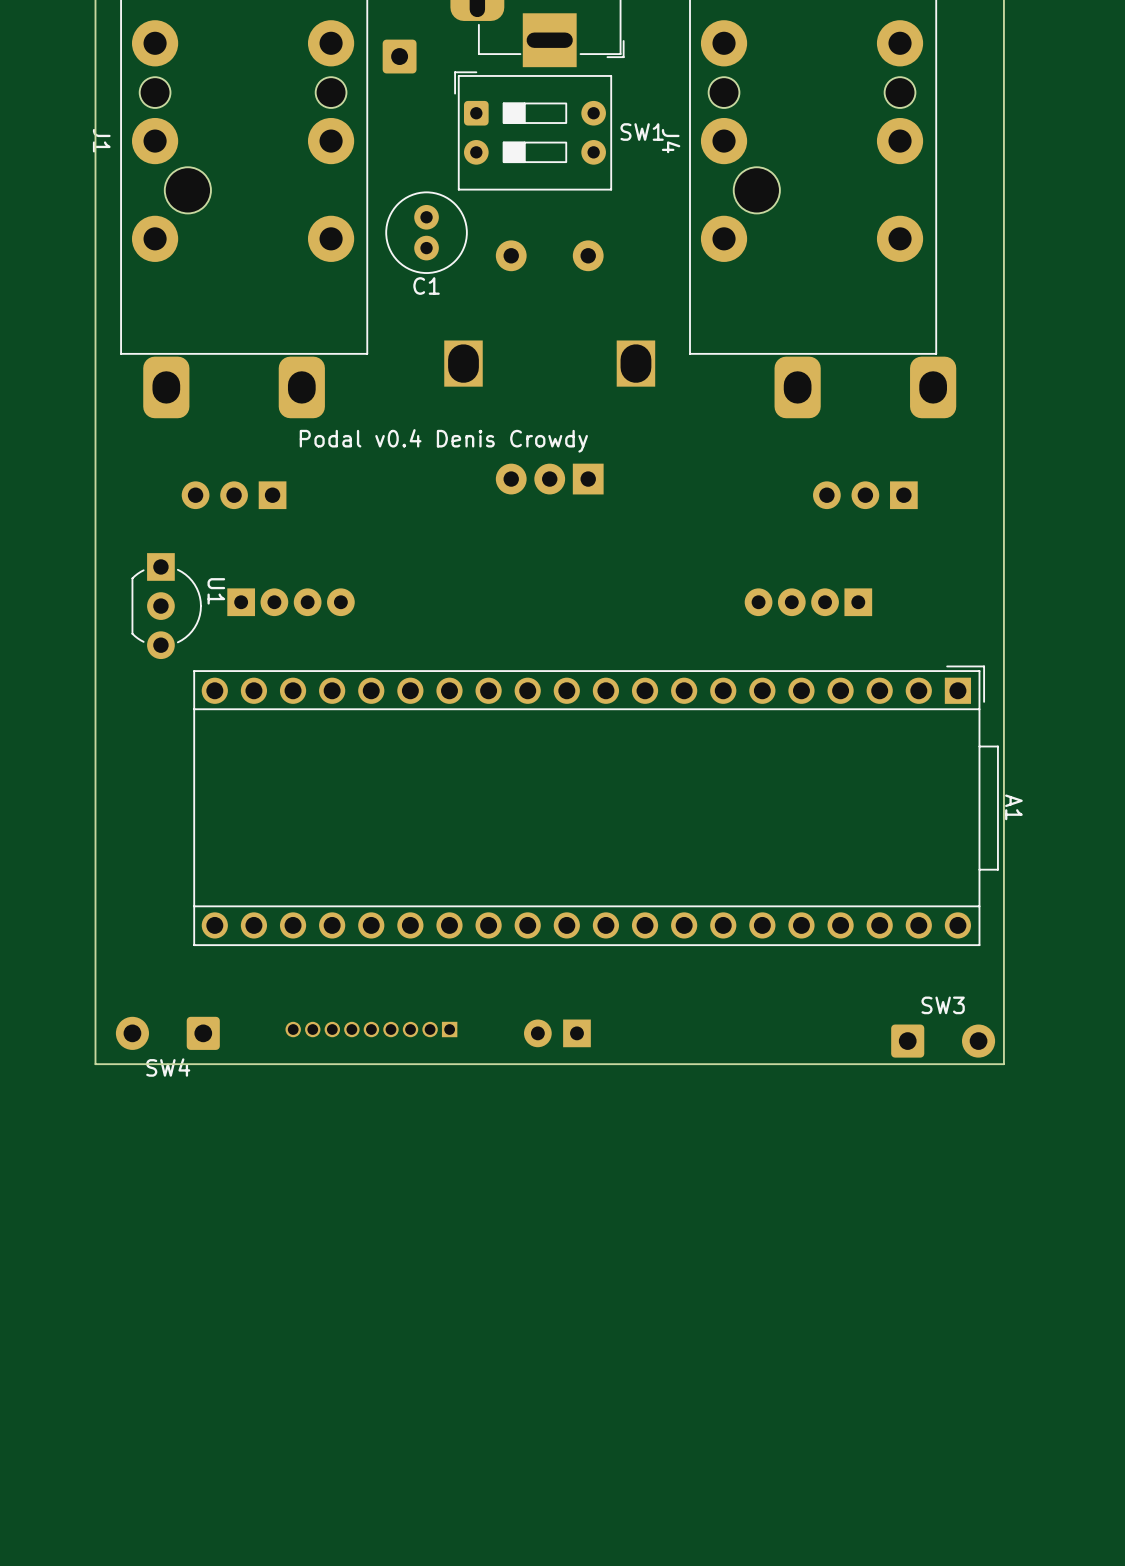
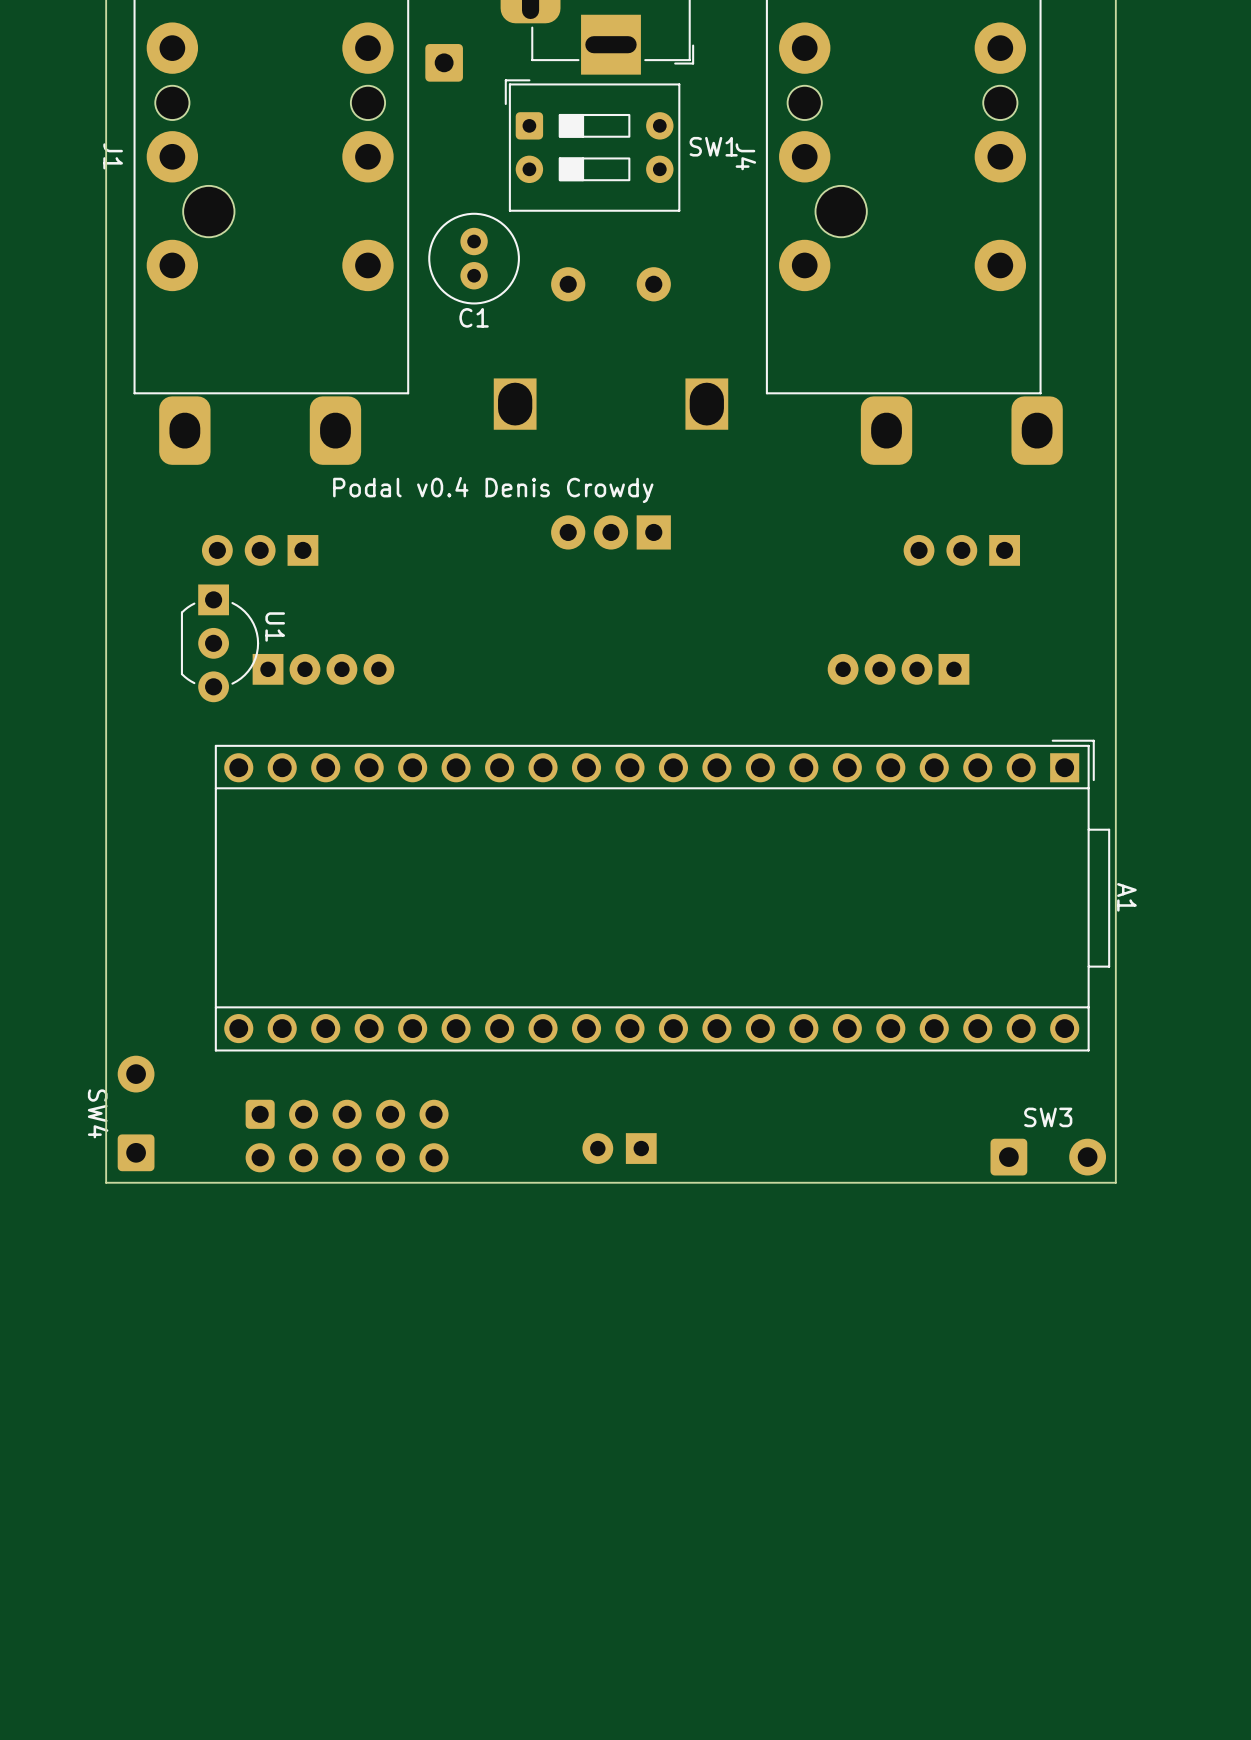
U1 position: (166, 606) -> (220, 643)
part: none -> (347, 1136)
part: (371, 1029) -> none
SW4 rotation: 0° (167, 1033) -> 90° clockwise (136, 1113)

